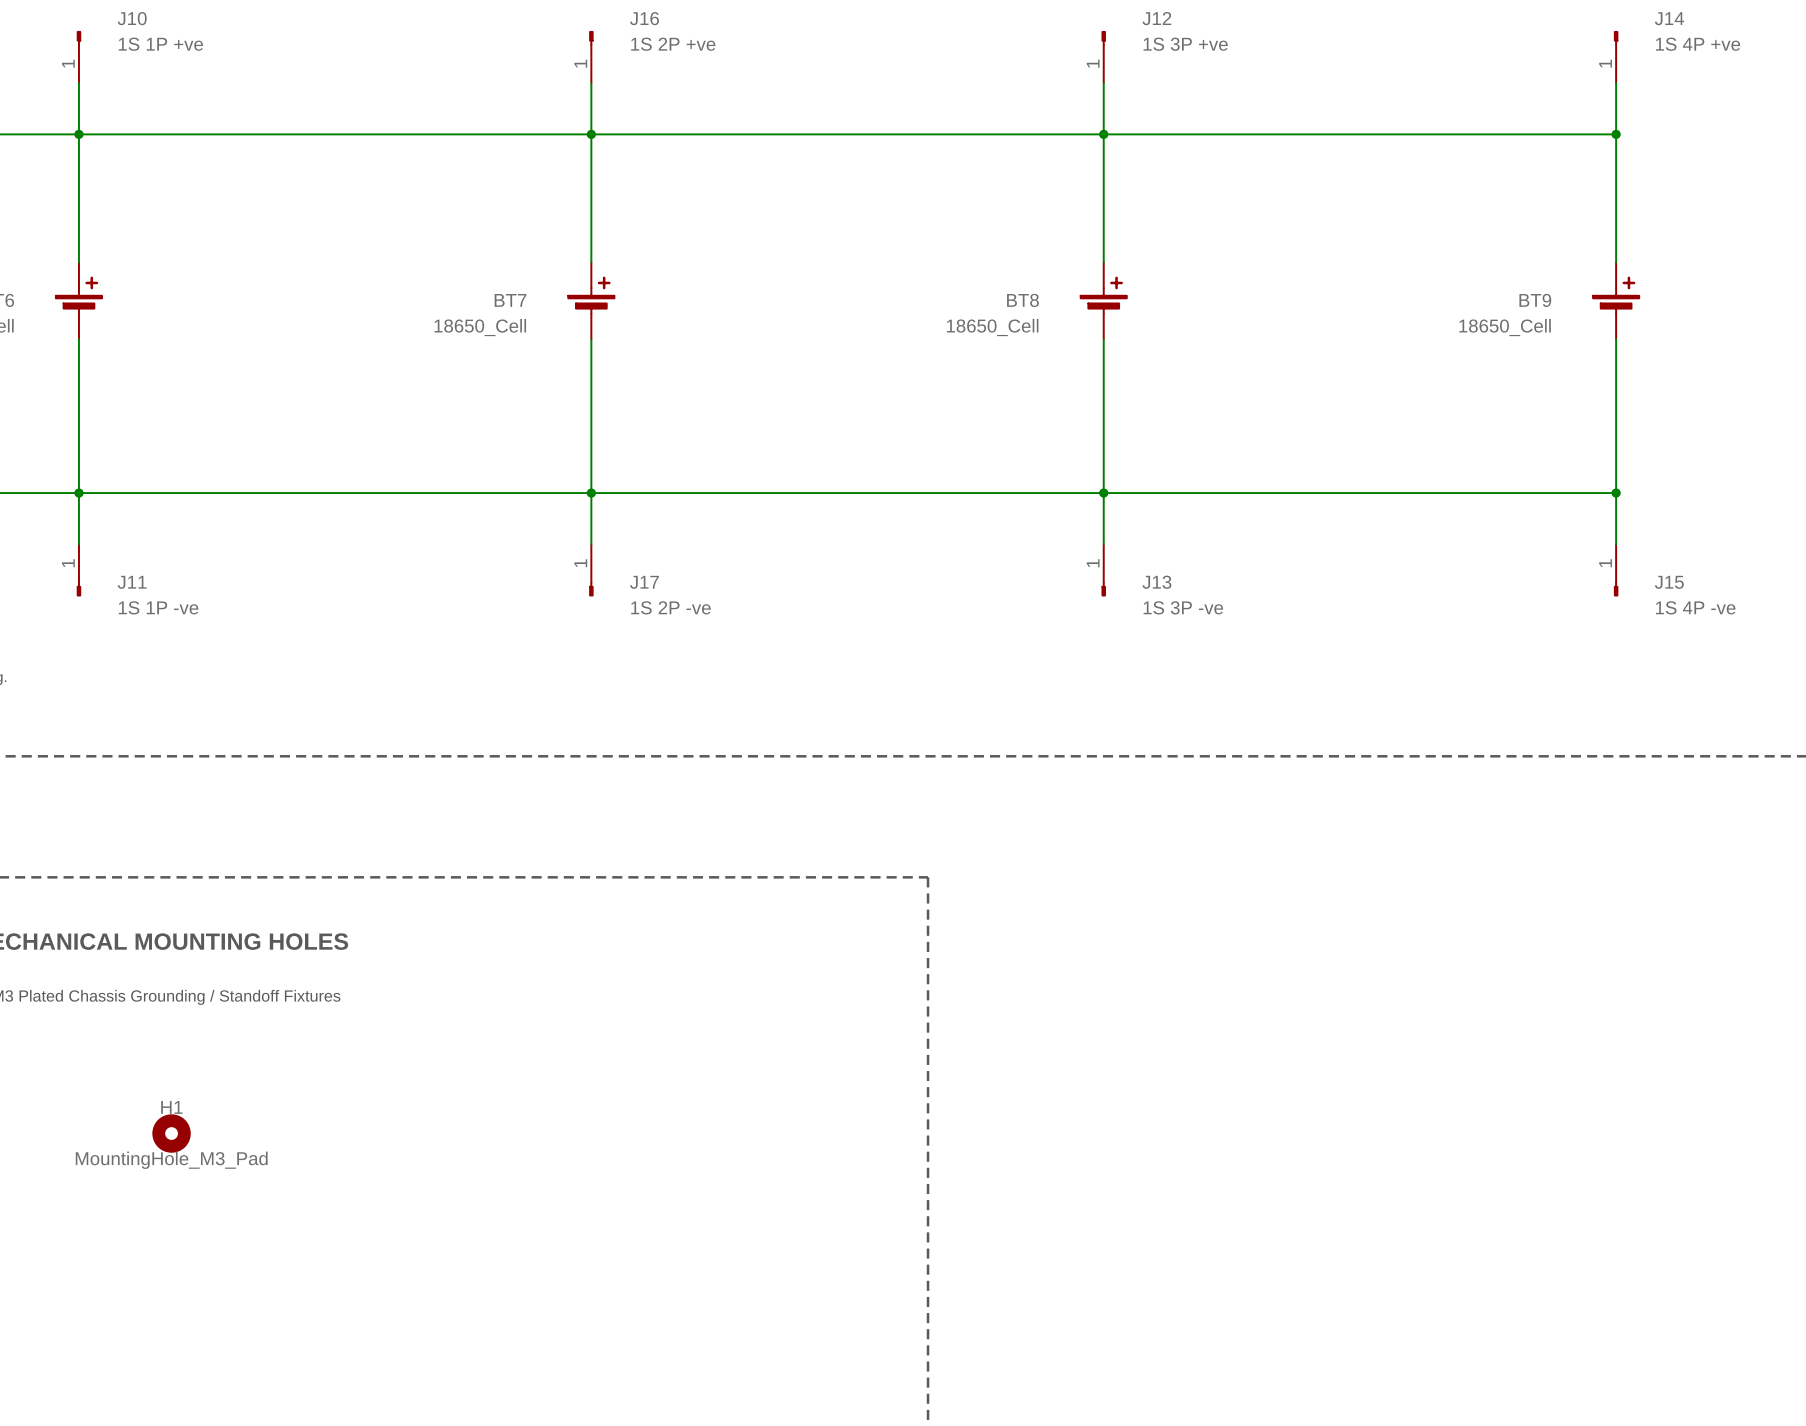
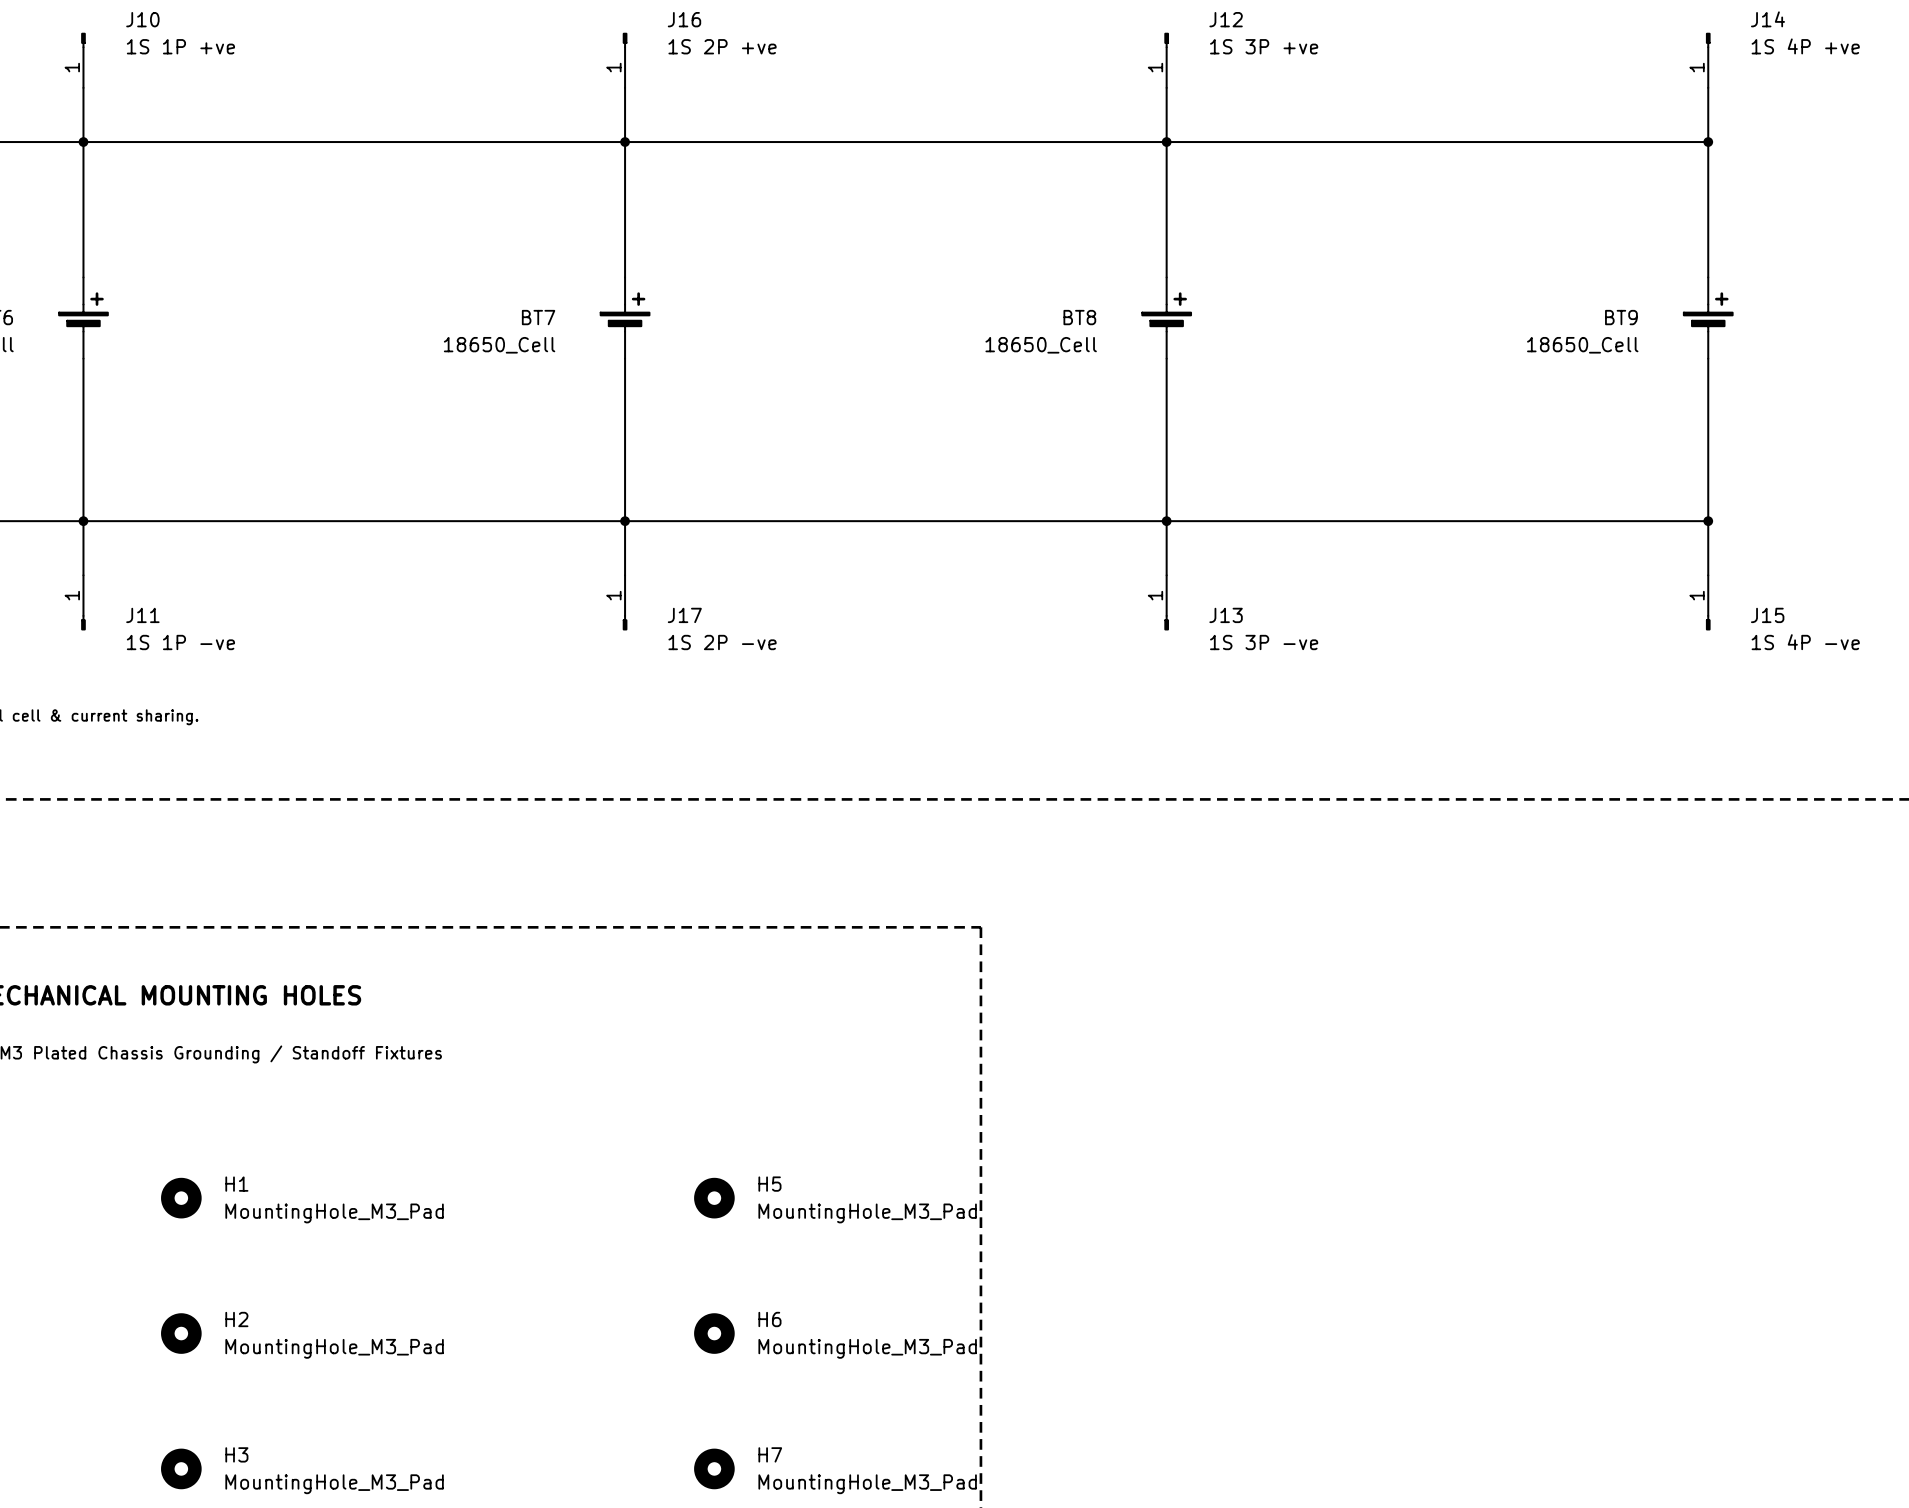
H1 name position: H1 (171, 1107) -> H1 (236, 1184)
H5: none -> MountingHole_M3_Pad (714, 1198)
H1 value position: MountingHole_M3_Pad (171, 1160) -> MountingHole_M3_Pad (334, 1213)
H2: none -> MountingHole_M3_Pad (181, 1333)
H6: none -> MountingHole_M3_Pad (714, 1333)
H3: none -> MountingHole_M3_Pad (181, 1468)
H7: none -> MountingHole_M3_Pad (714, 1468)

